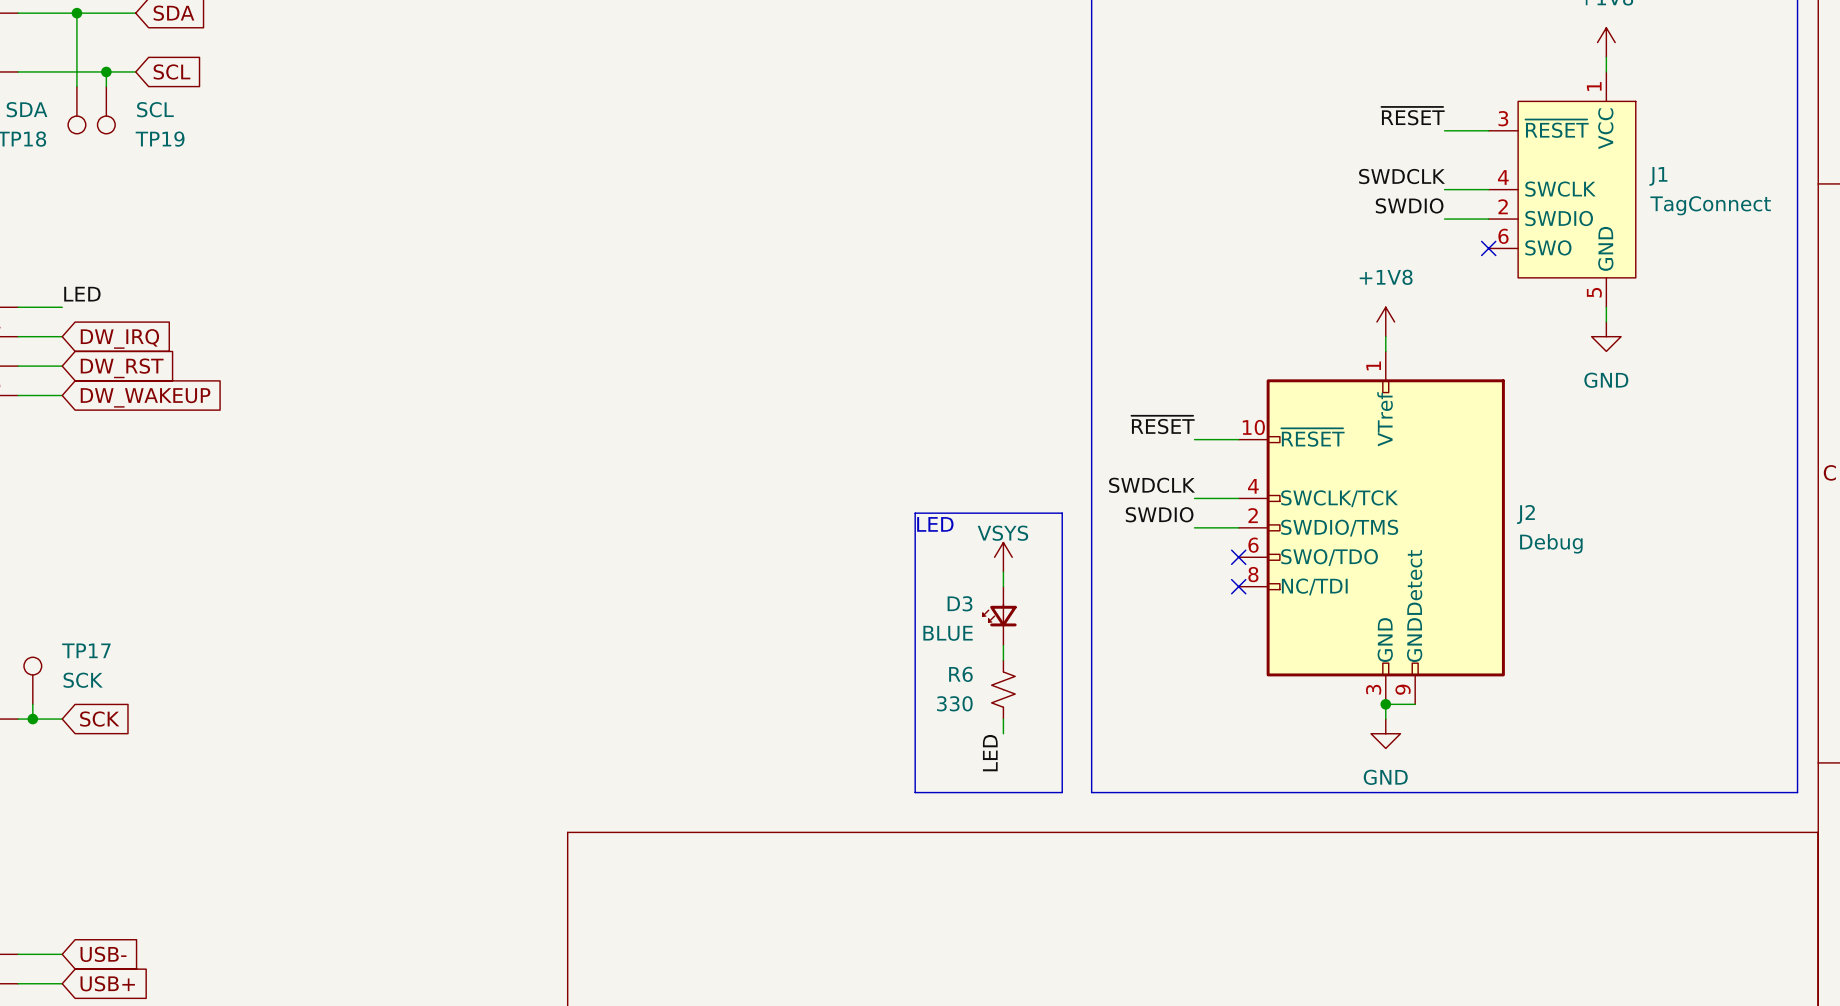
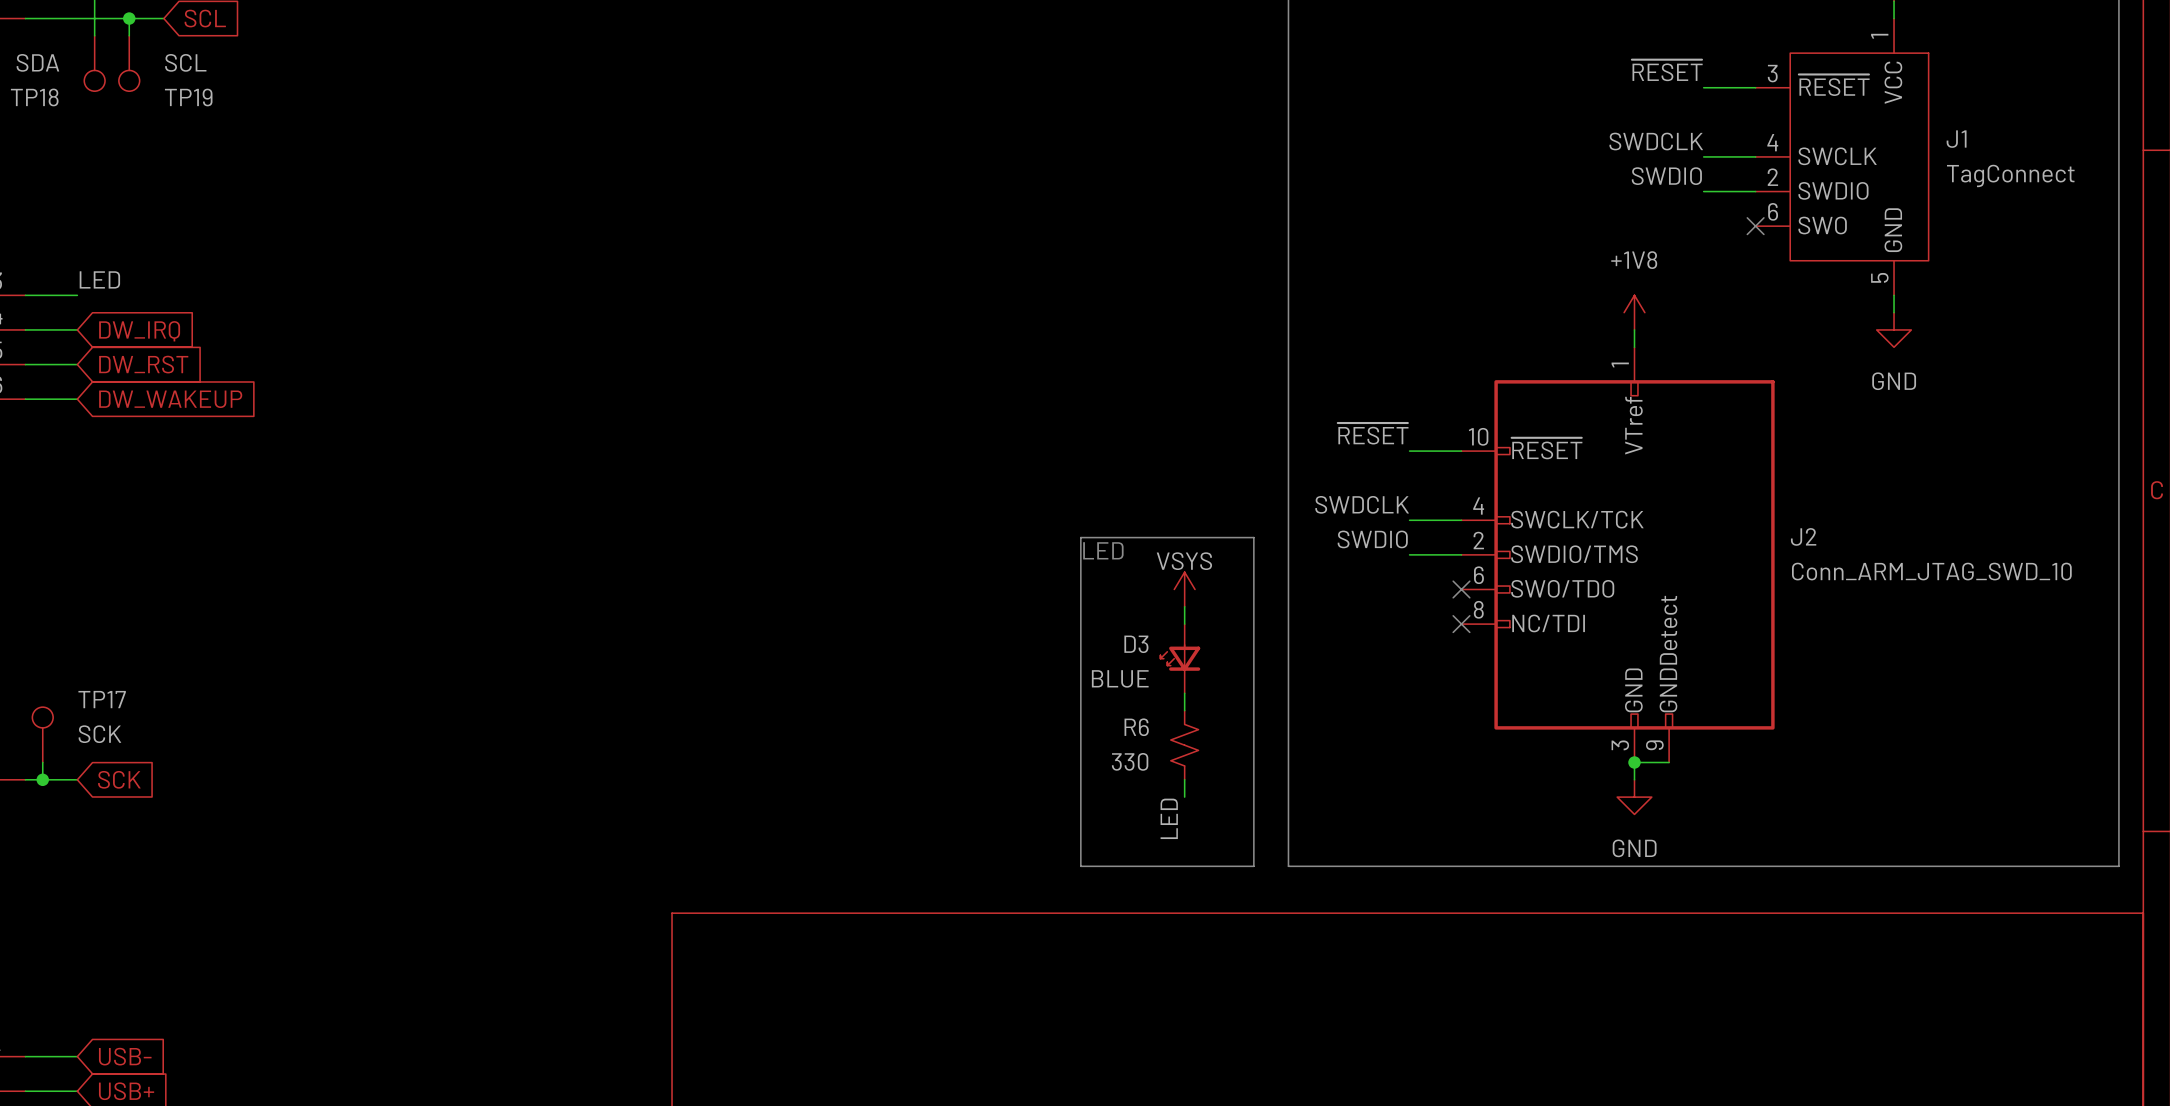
J2 value: Debug (1551, 543) -> Conn_ARM_JTAG_SWD_10 (1931, 571)

